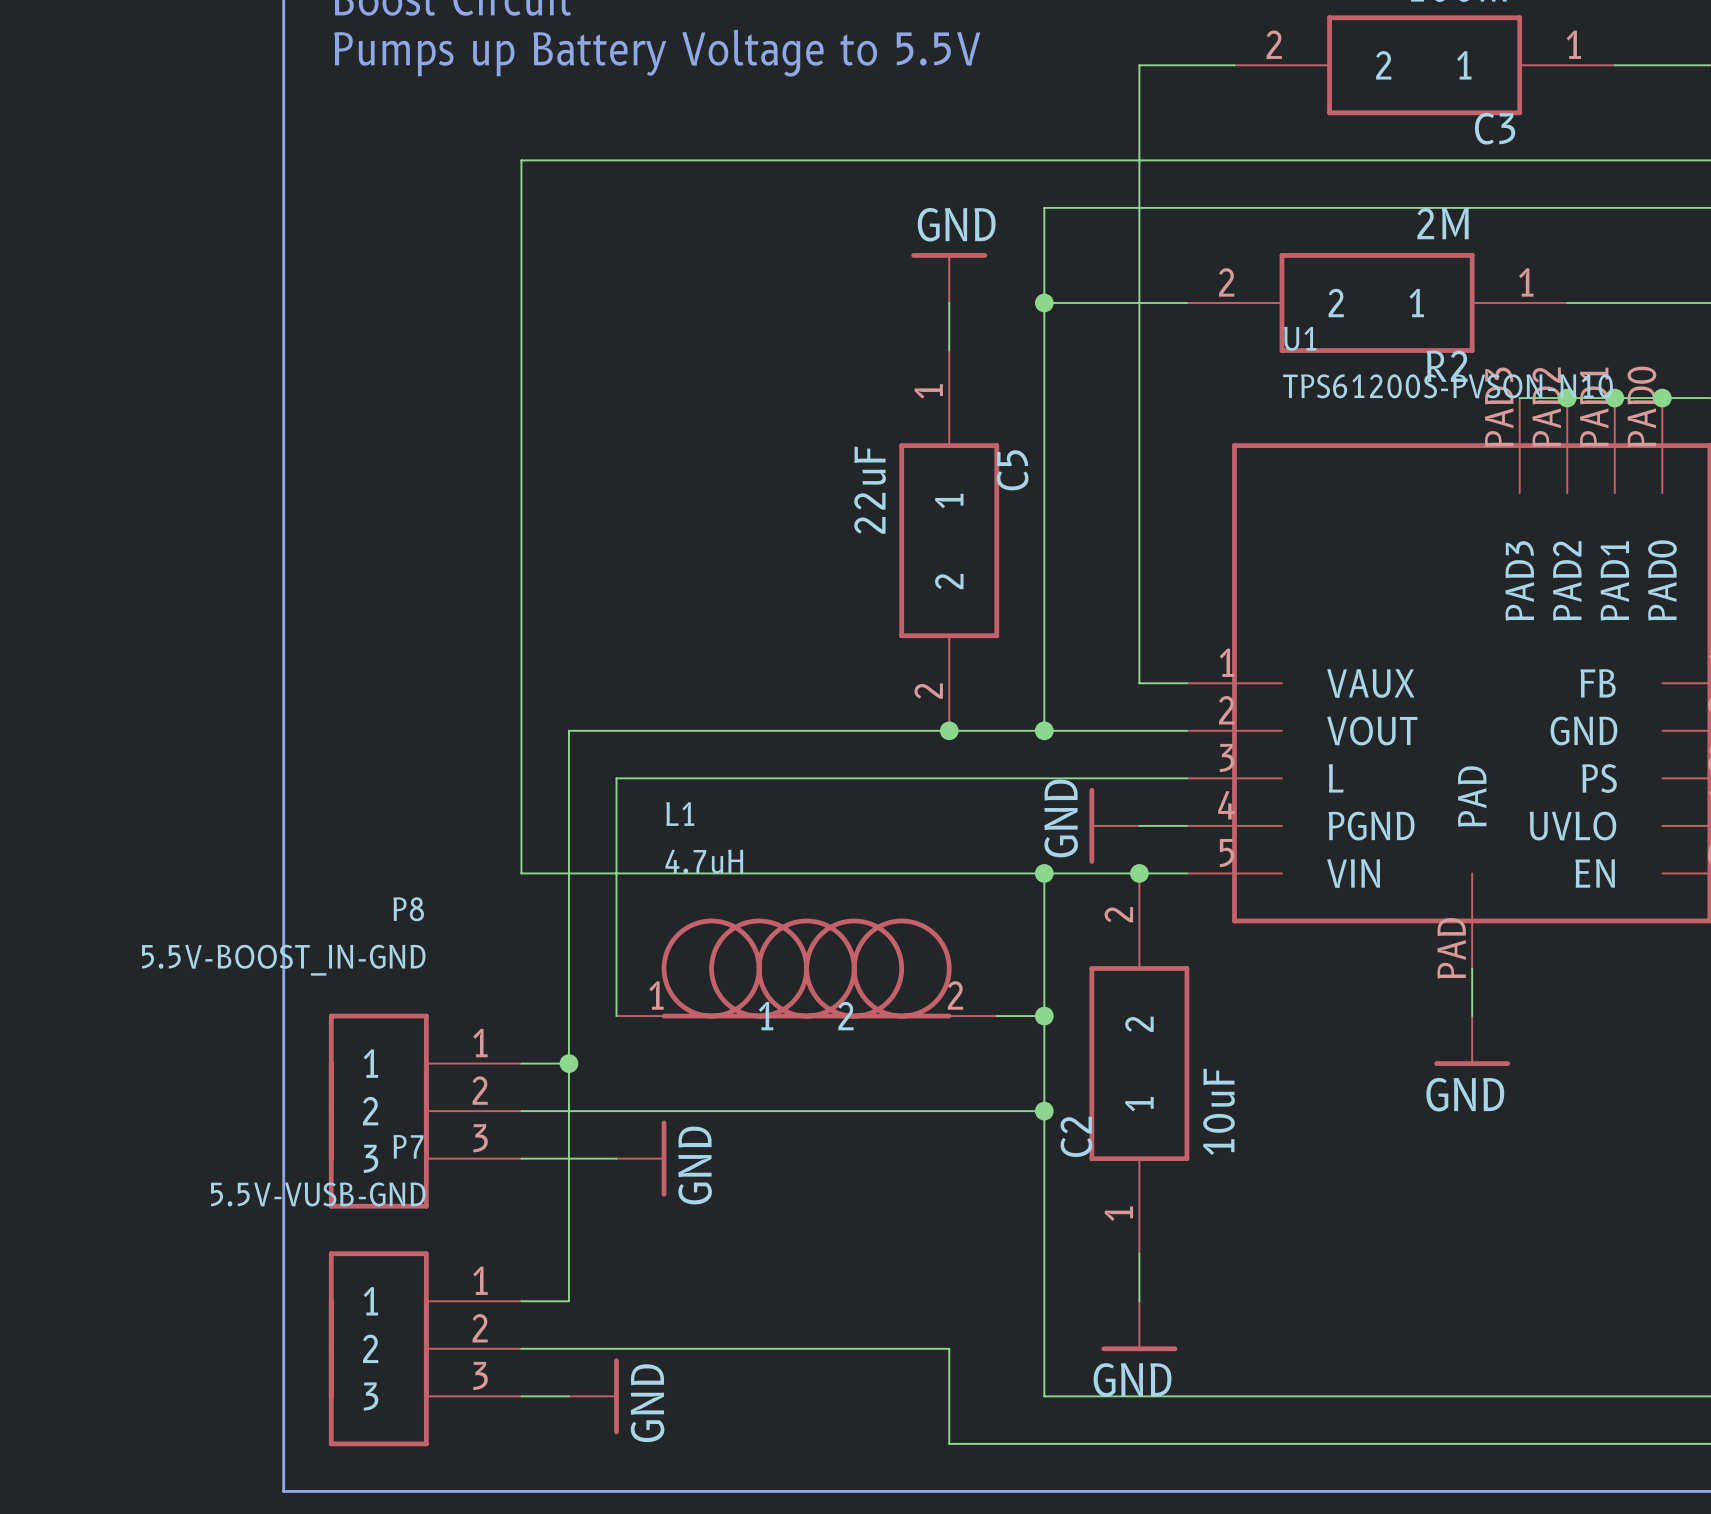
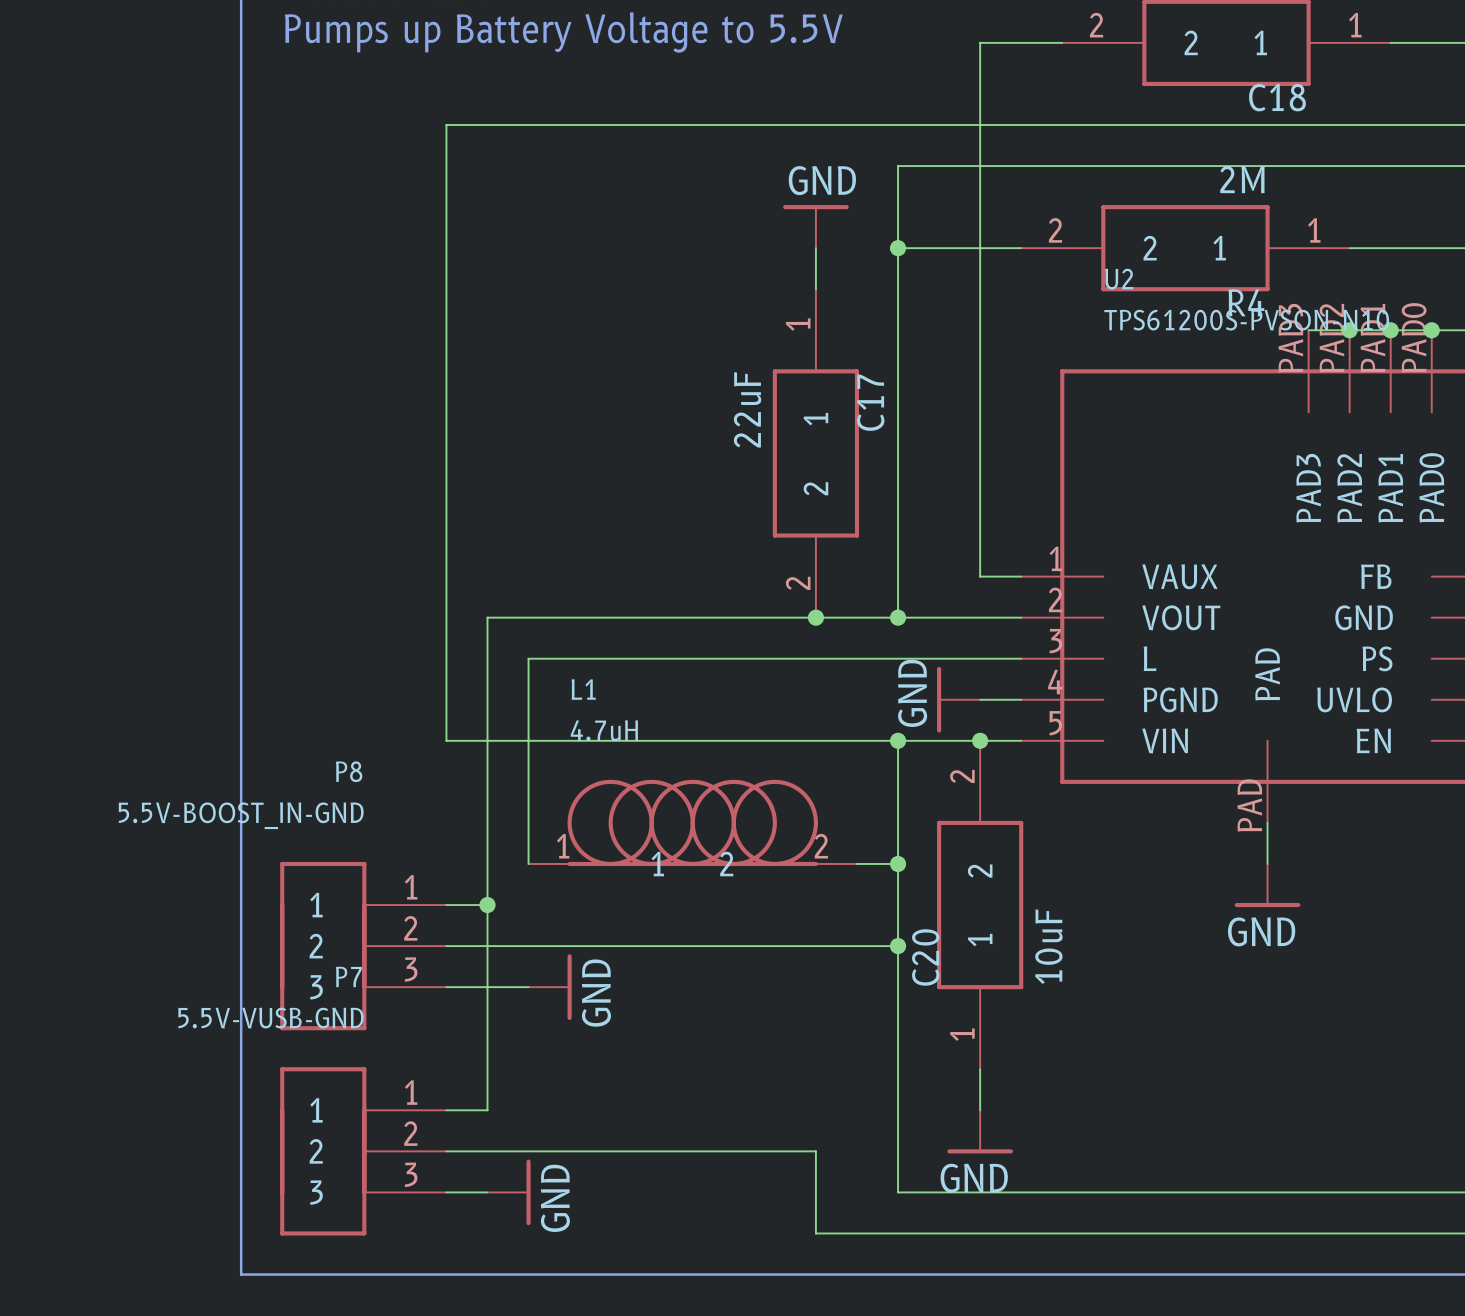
C3 name: C3 (1495, 128) -> C18 (1277, 97)
U1 name: U1 (1300, 338) -> U2 (1119, 279)
R2 name: R2 (1447, 366) -> R4 (1246, 302)
C5 name: C5 (1012, 470) -> C17 (870, 402)
C2 name: C2 (1076, 1136) -> C20 (925, 957)

